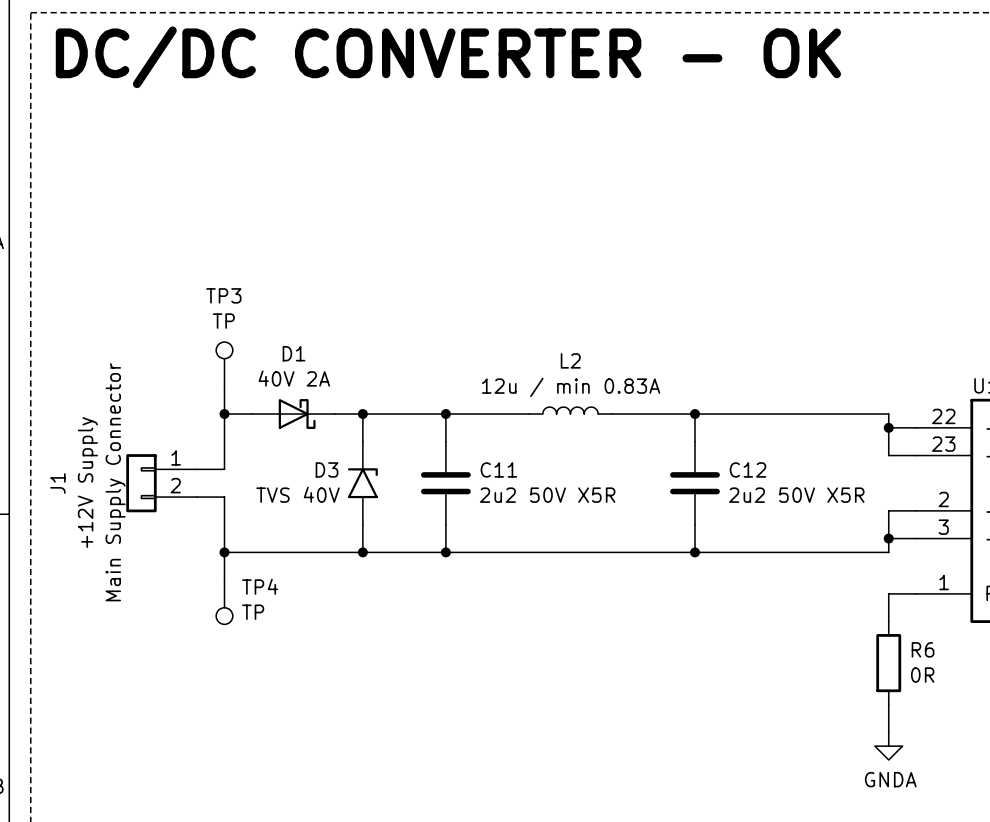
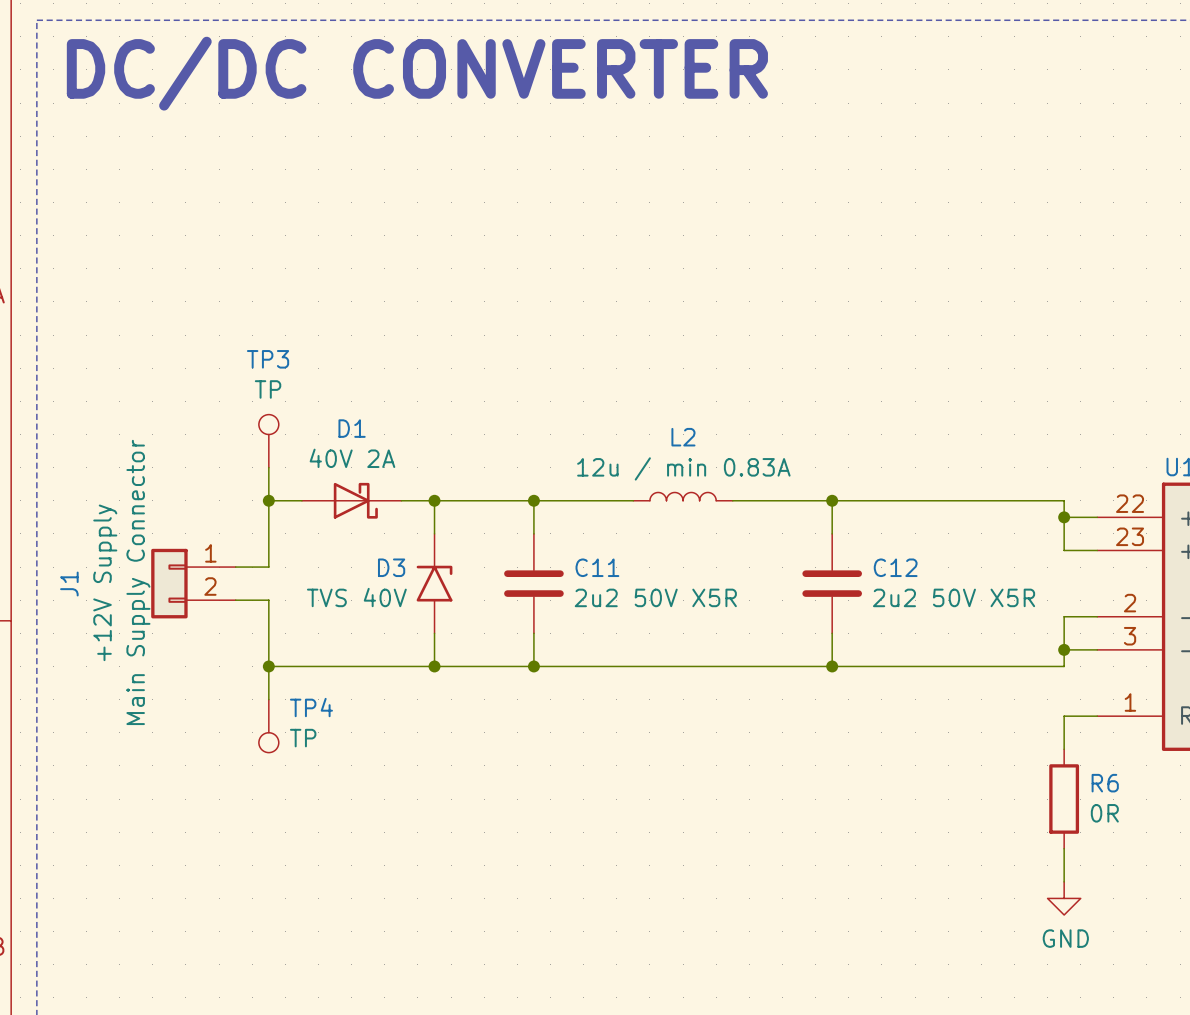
text: DC/DC CONVERTER - OK (448, 57) -> DC/DC CONVERTER (417, 73)
power symbol: GNDA (888, 746) -> GND (1064, 898)

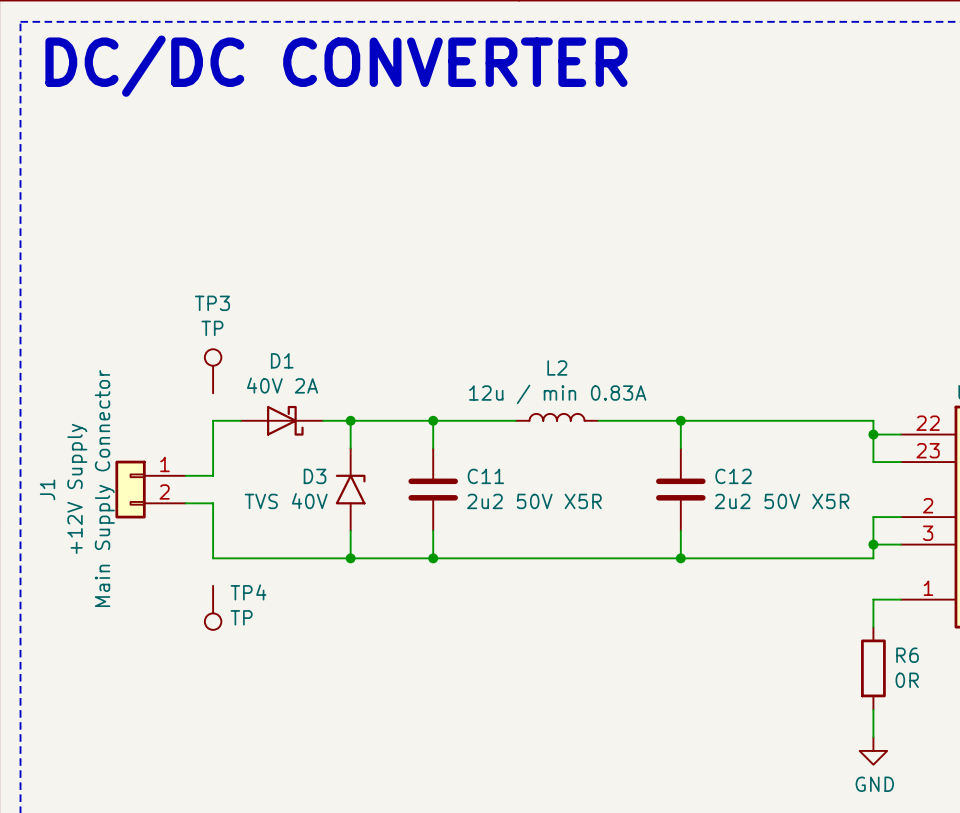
wire: (268, 467) (268, 500) -> none
junction: (268, 500) -> none
wire: (268, 666) (268, 699) -> none
junction: (268, 666) -> none

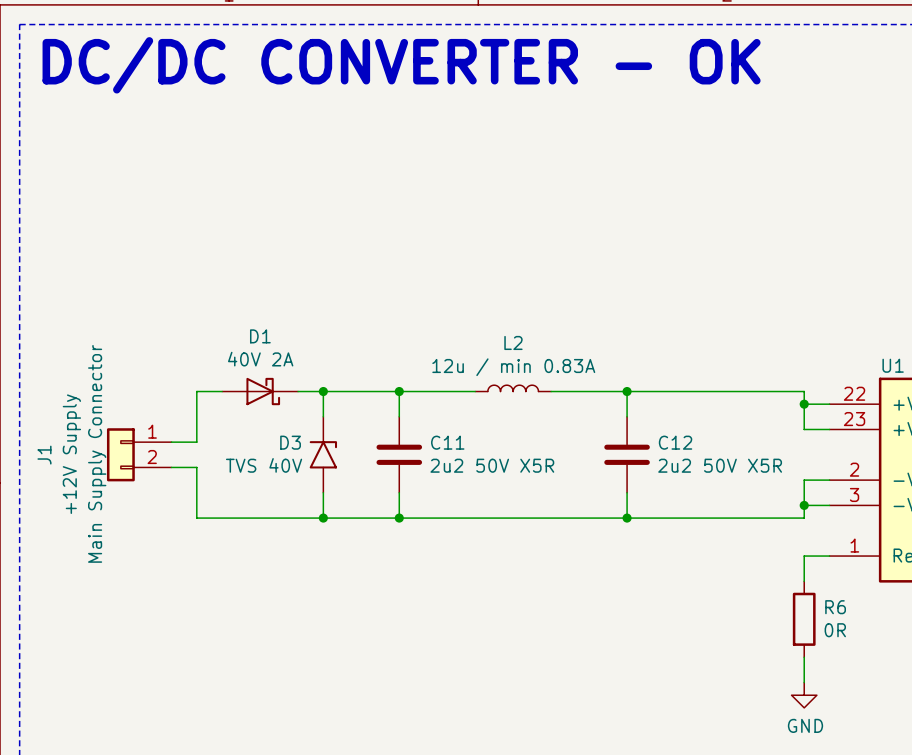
text: DC/DC CONVERTER (336, 66) -> DC/DC CONVERTER - OK (401, 65)
TP3: TP (213, 371) -> none
TP4: TP (213, 607) -> none

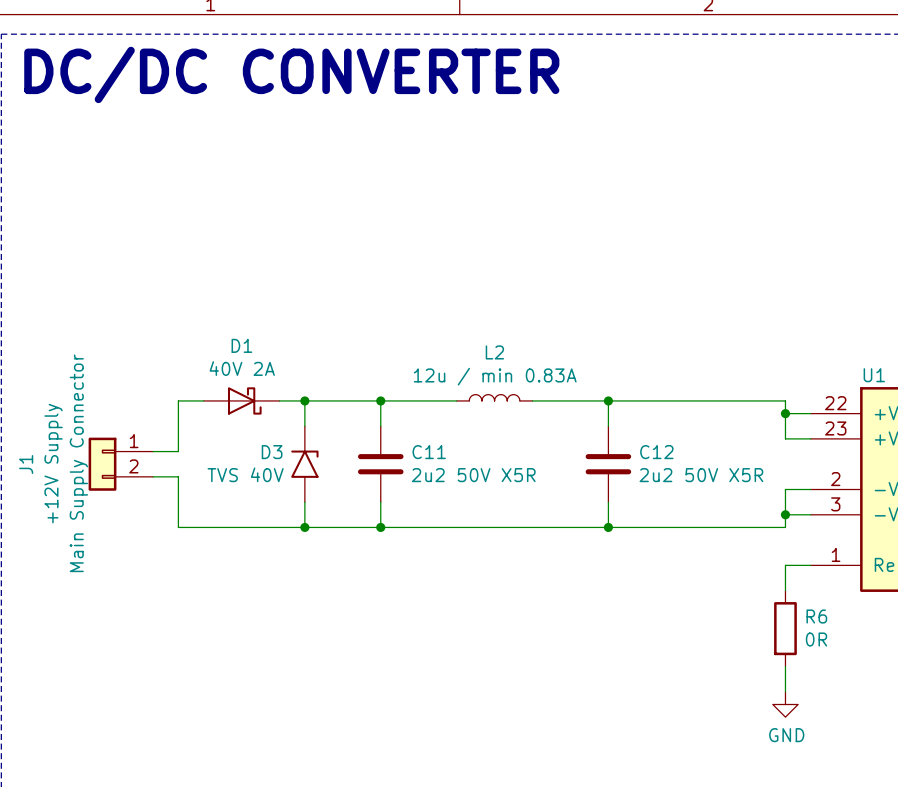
text: DC/DC CONVERTER - OK (401, 65) -> DC/DC CONVERTER (291, 74)

